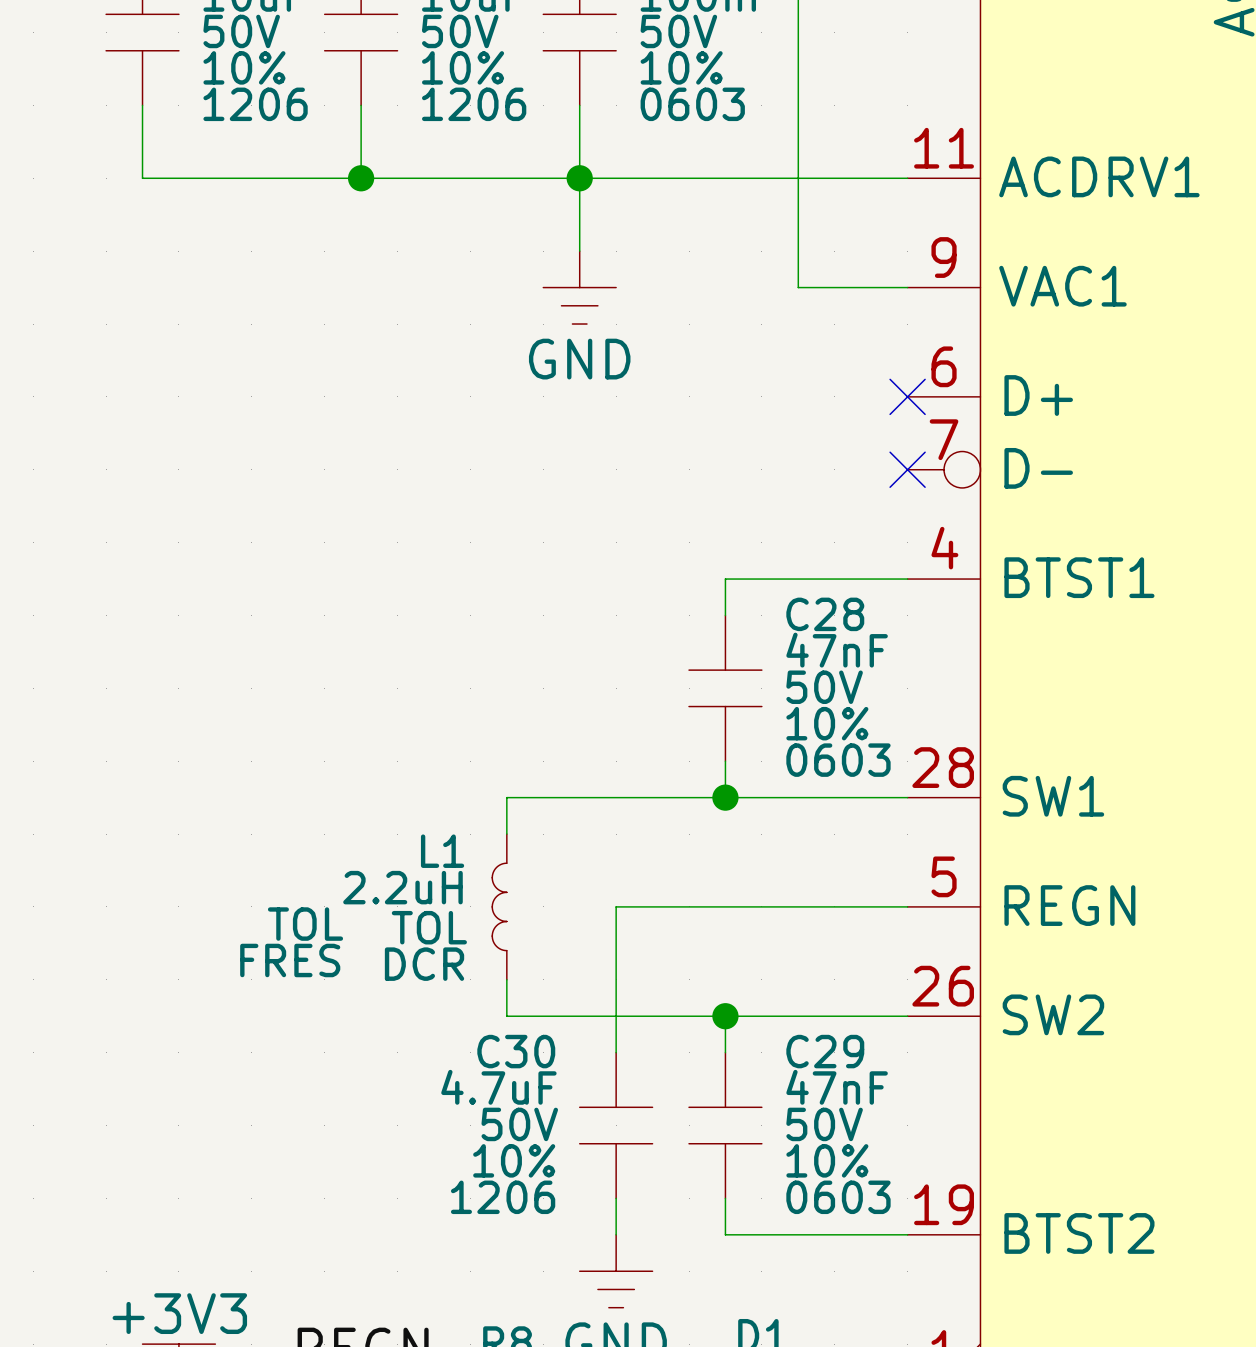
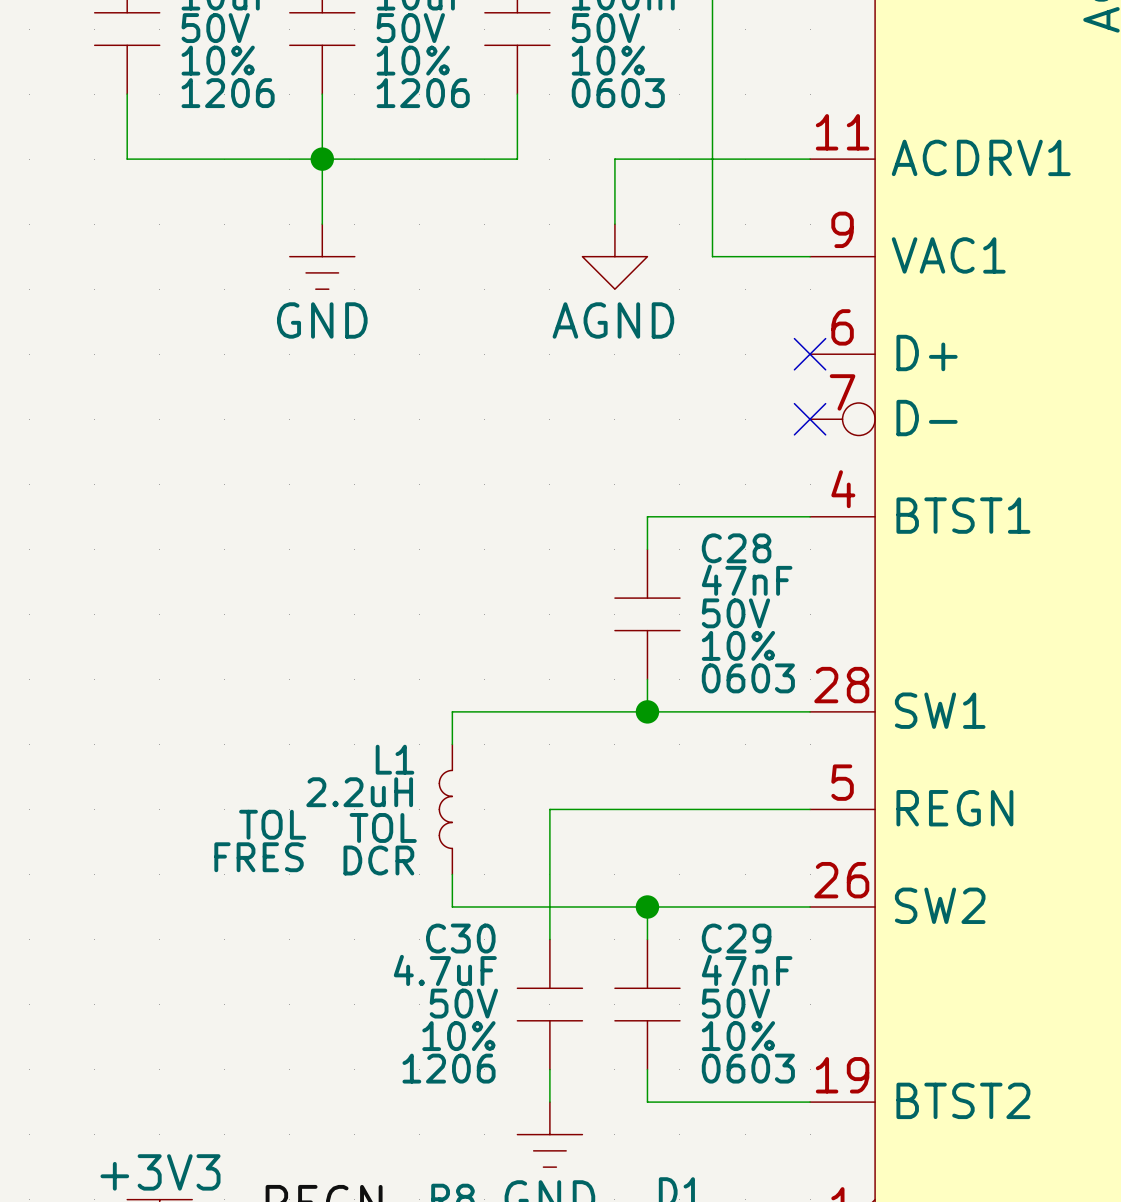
wire: none -> (322, 159) (322, 224)
junction: (579, 178) -> none
wire: (689, 178) (579, 178) (579, 251) -> (614, 159) (614, 224)
power symbol position: GND (579, 287) -> GND (322, 256)
power symbol: none -> AGND (614, 256)

